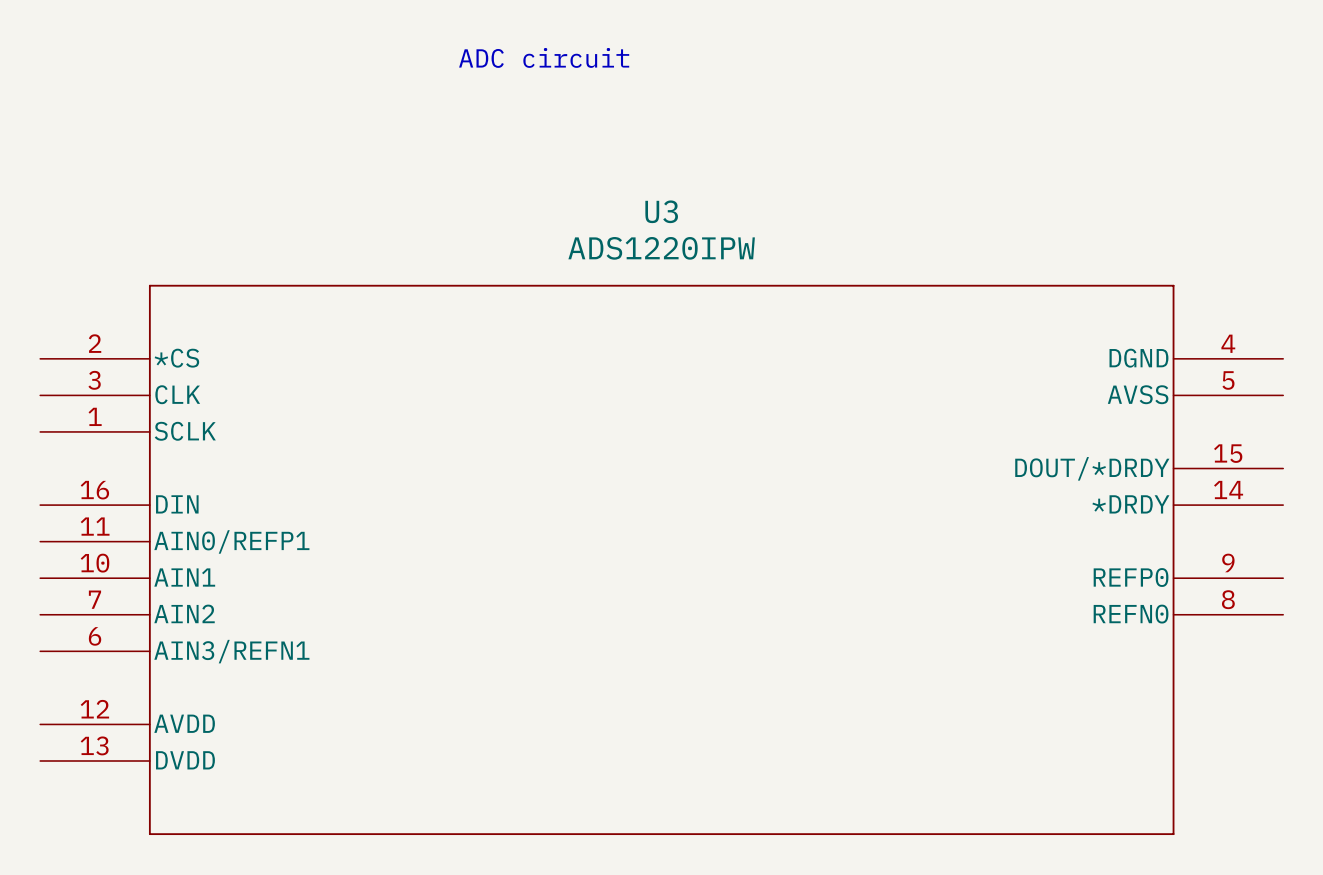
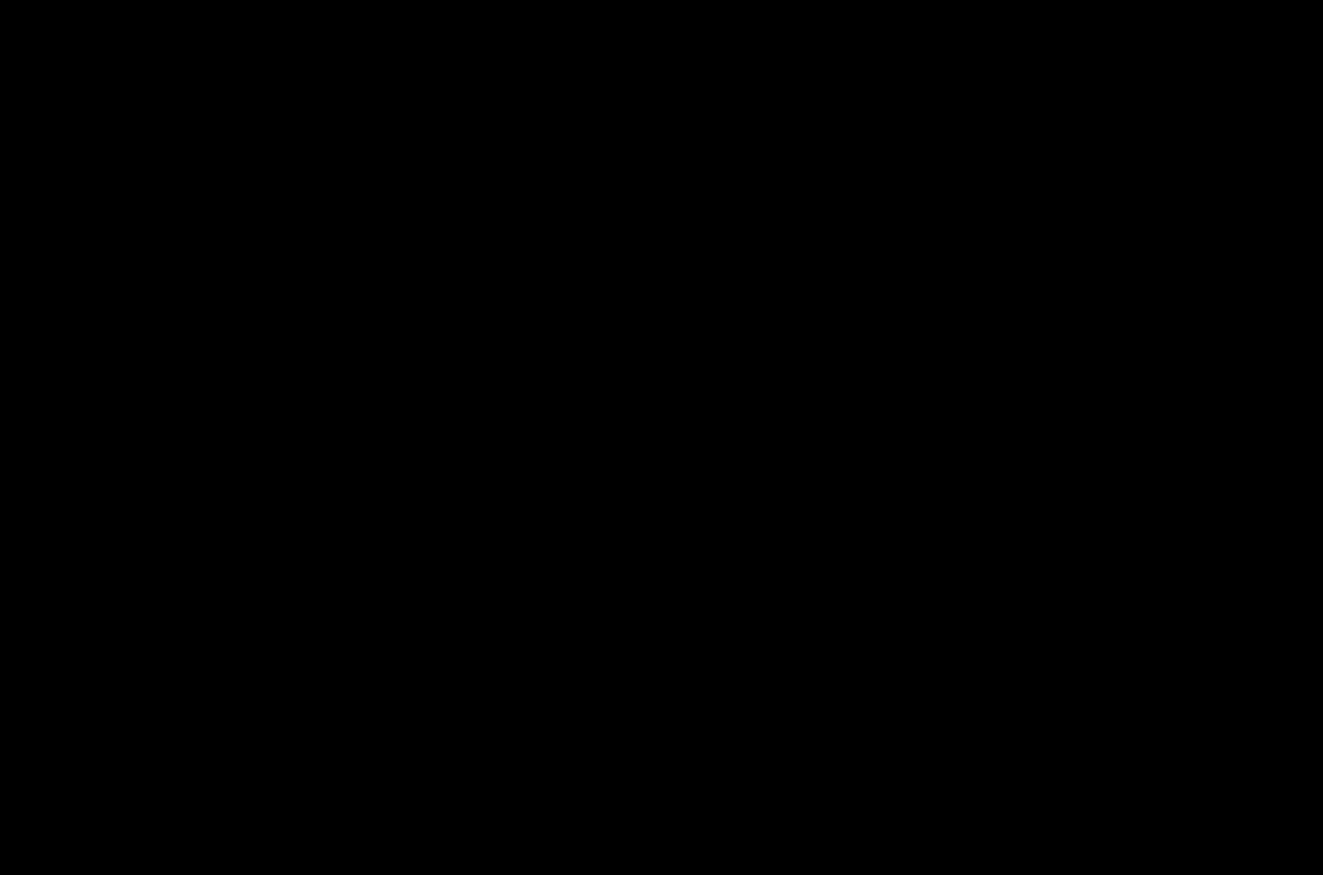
text: ADC circuit (544, 57) -> none
U3: ADS1220IPW (661, 559) -> none

